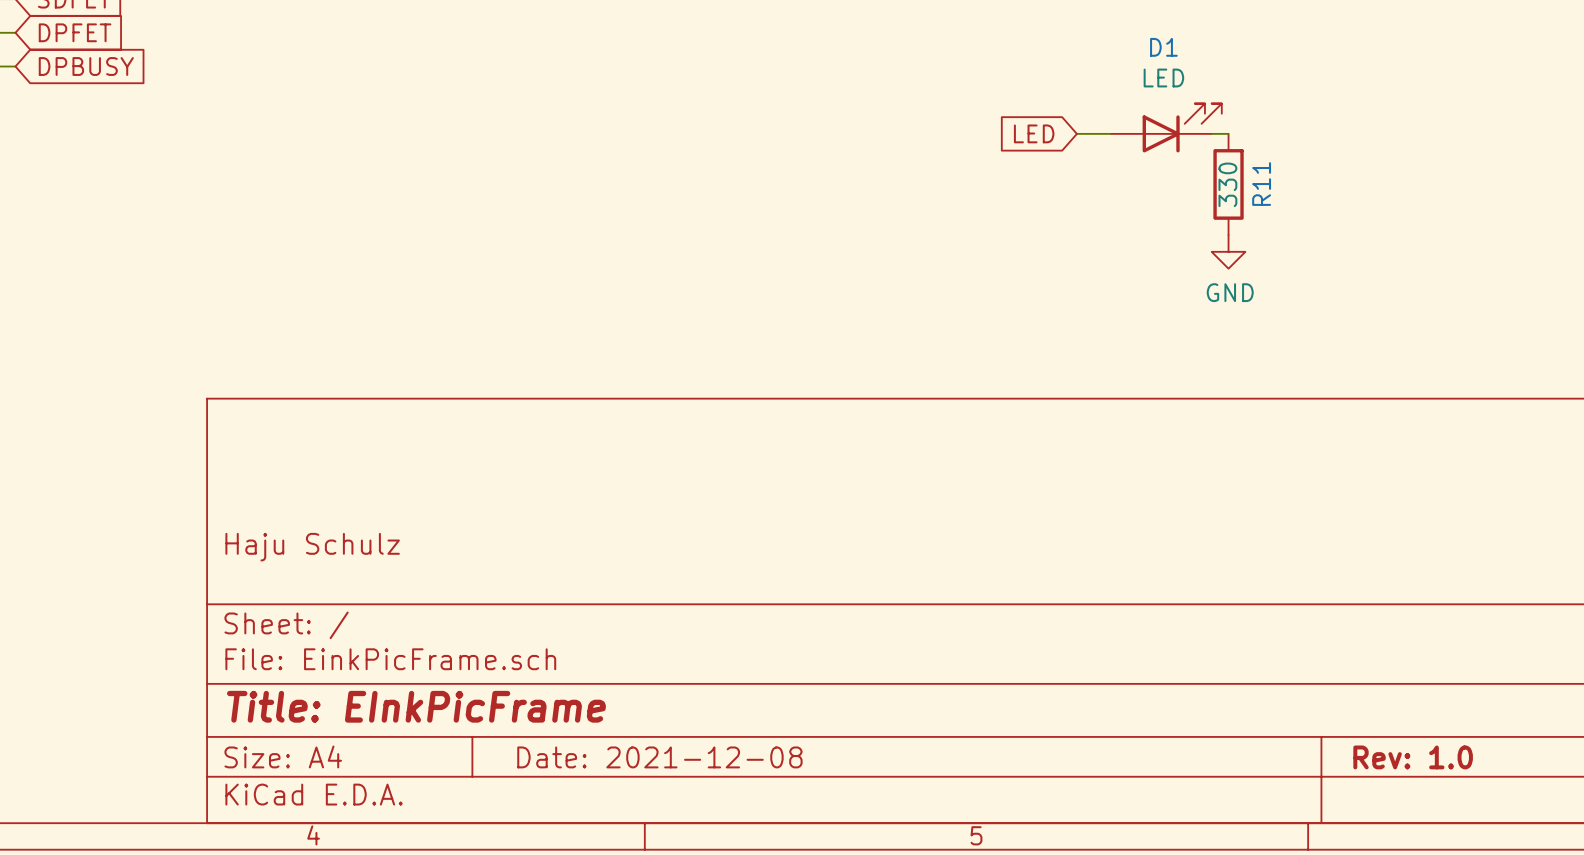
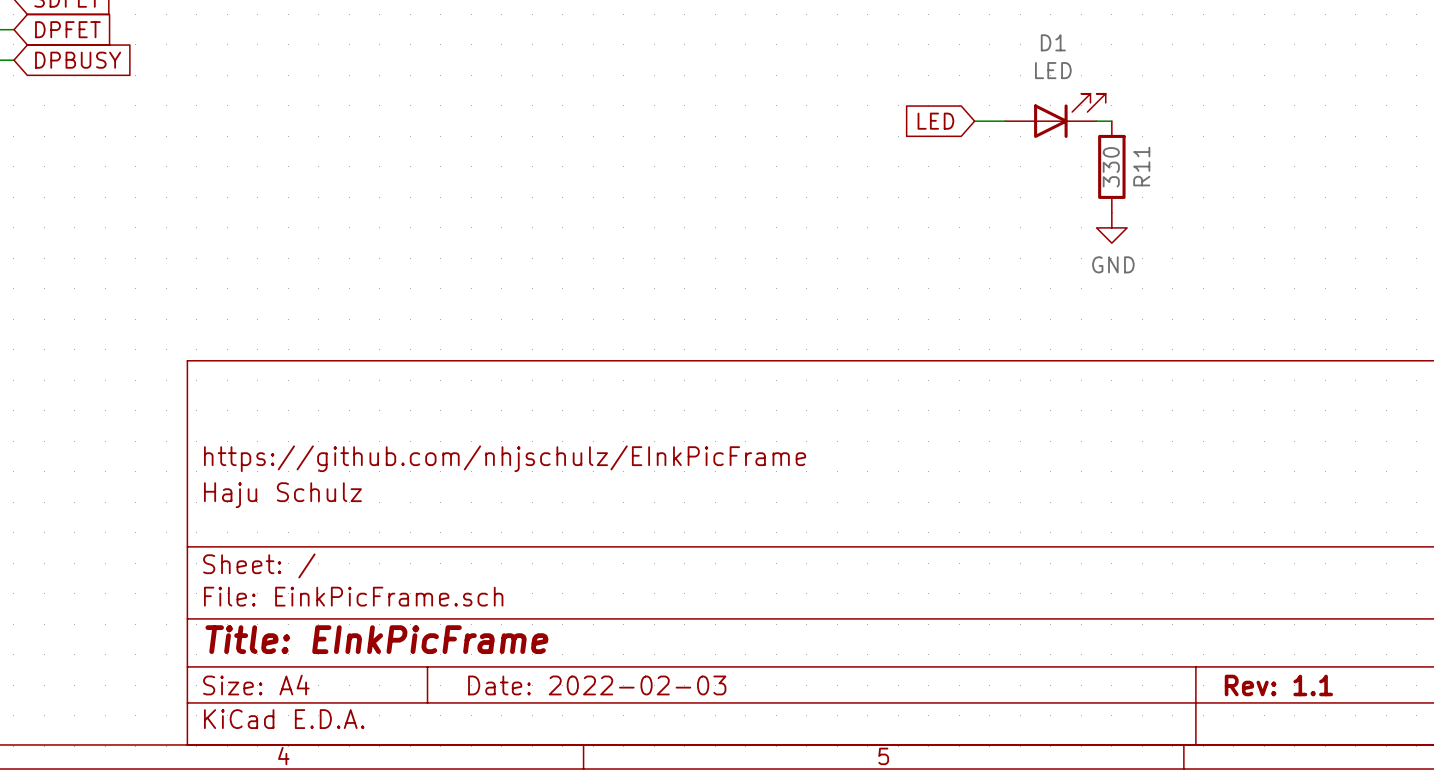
title block: none -> https://github.com/nhjschulz/EInkPicFrame (505, 458)
title block: Date: 2021-12-08 (659, 757) -> Date: 2022-02-03 (597, 685)
title block: Rev: 1.0 (1413, 757) -> Rev: 1.1 (1278, 685)

